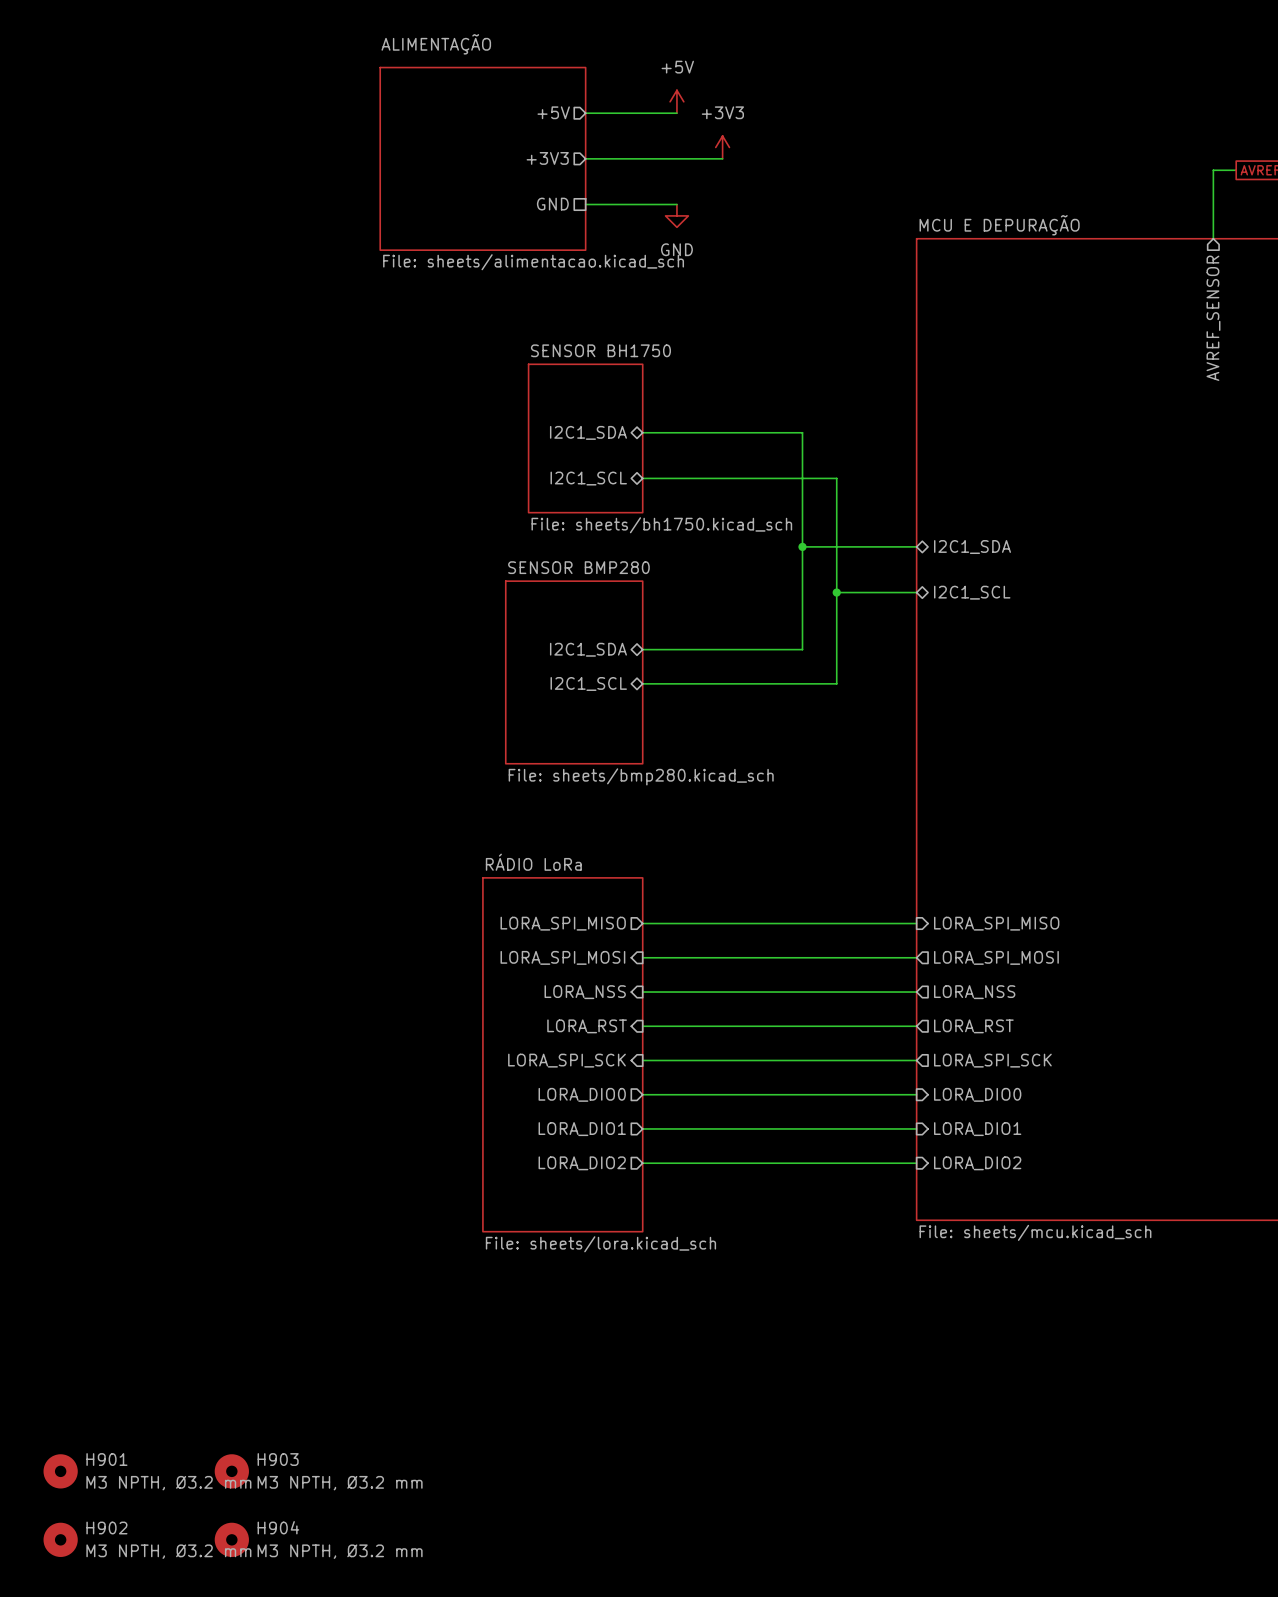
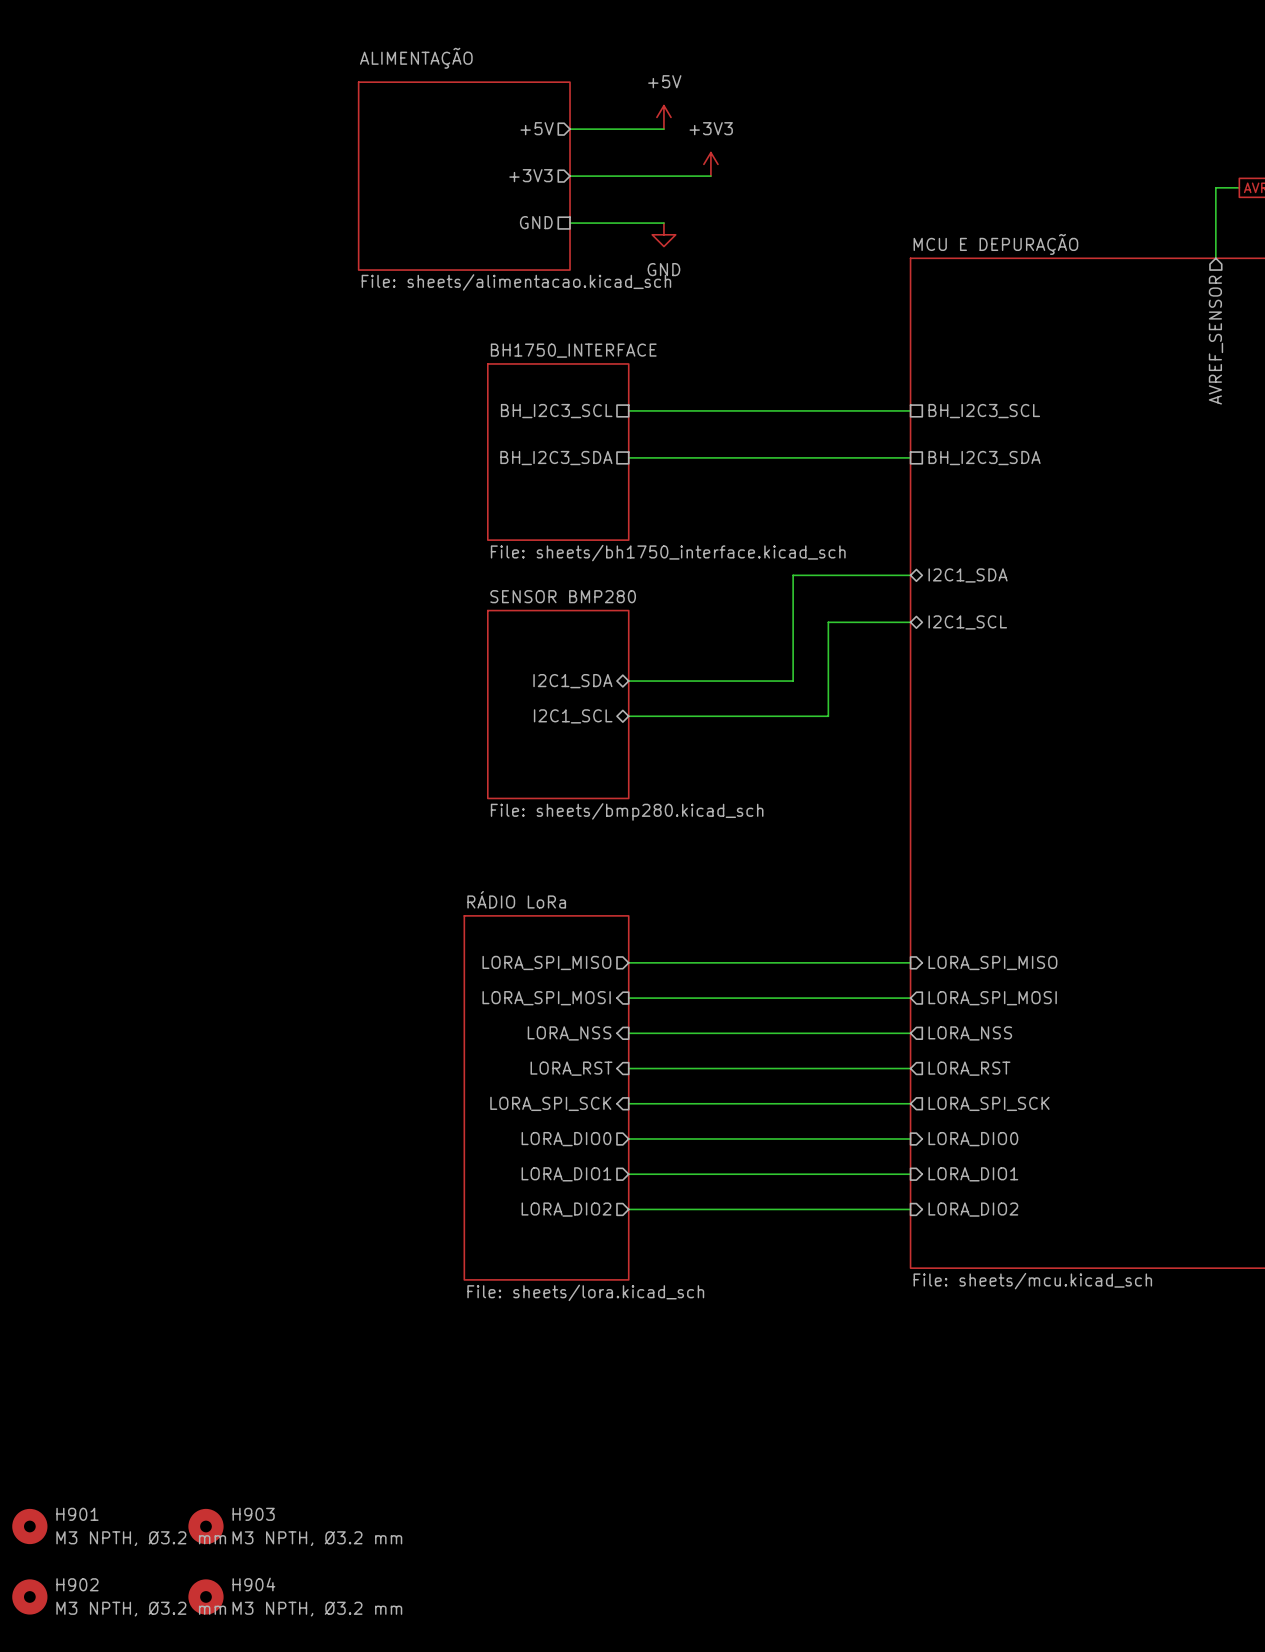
sheet pin: none -> BH_I2C3_SCL (556, 411)
wire: none -> (628, 410) (910, 410)
sheet pin: none -> BH_I2C3_SCL (984, 411)
sheet BH1750_INTERFACE: none -> File: sheets/bh1750_interface.kicad_sch (558, 452)
sheet pin shape: bidirectional (588, 432) -> passive (556, 458)
sheet pin: I2C1_SDA (588, 432) -> BH_I2C3_SDA (556, 458)
wire: (802, 432) (802, 546) -> (793, 457) (910, 457)
sheet pin: none -> BH_I2C3_SDA (984, 458)
sheet SENSOR BH1750: File: sheets/bh1750.kicad_sch (585, 438) -> none
sheet pin: I2C1_SCL (588, 478) -> none
wire: (642, 478) (836, 478) (836, 592) -> none
junction: (802, 546) -> none
junction: (836, 592) -> none

